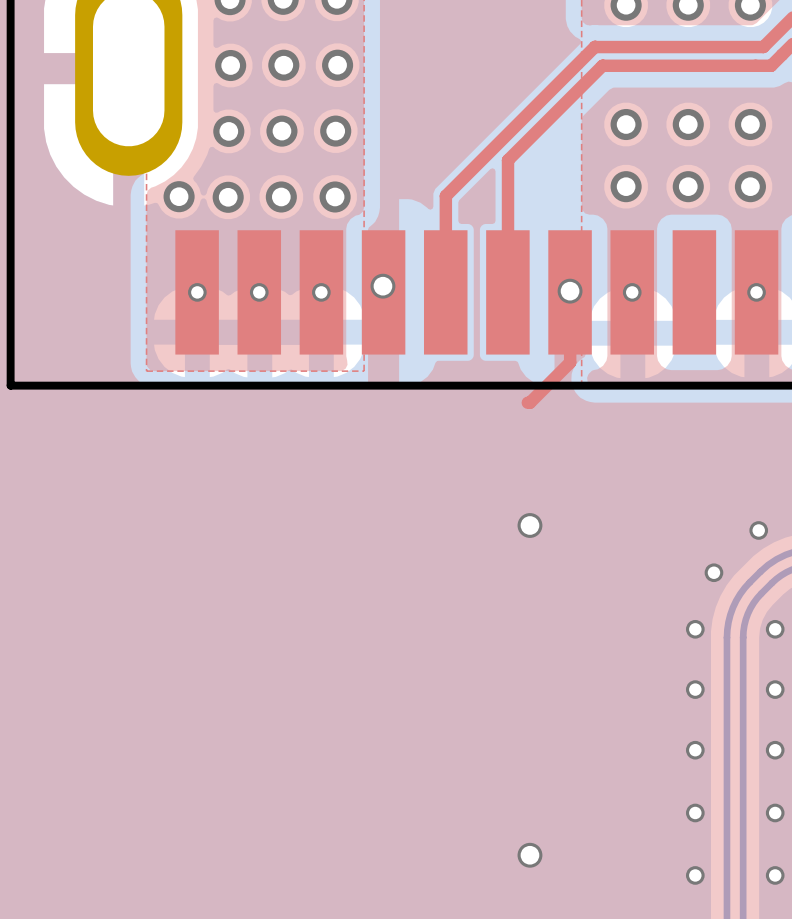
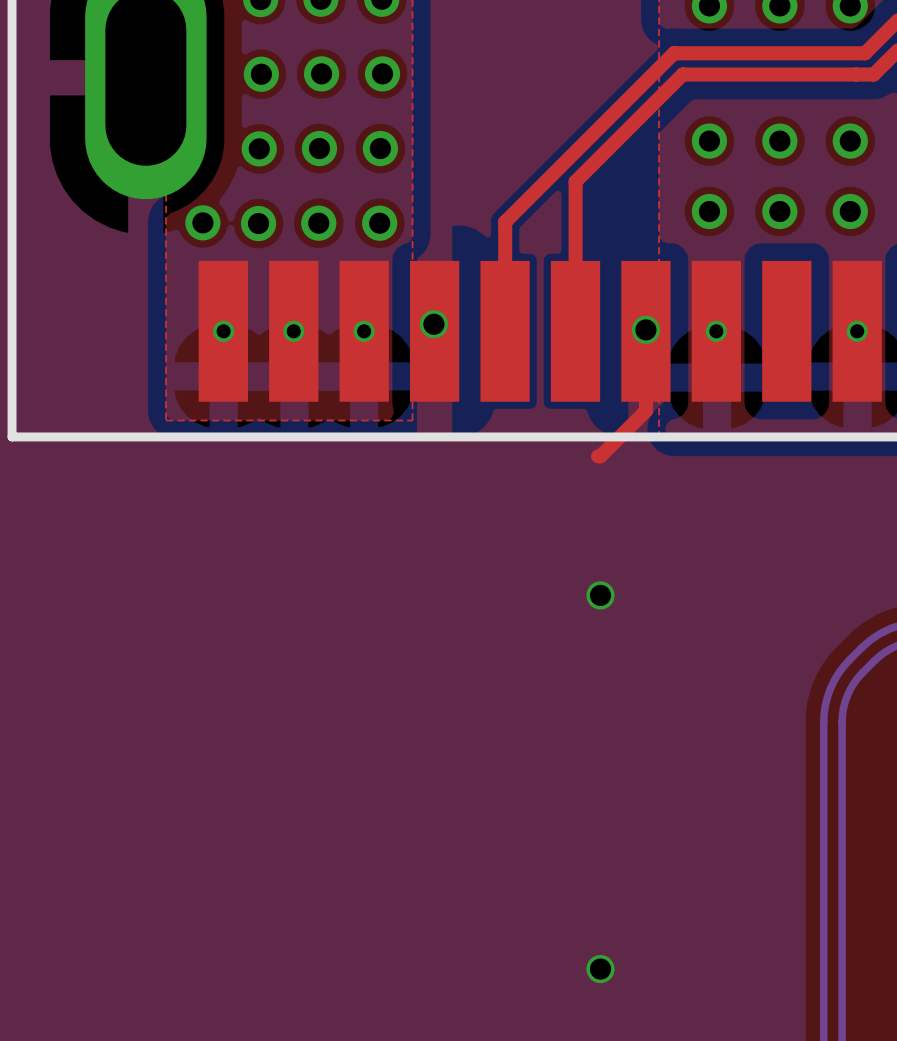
via: (758, 530) -> none
via: (713, 572) -> none
via: (695, 629) -> none
via: (775, 629) -> none
via: (695, 689) -> none
via: (775, 689) -> none
via: (695, 750) -> none
via: (775, 750) -> none
via: (695, 812) -> none
via: (775, 812) -> none
via: (695, 875) -> none
via: (775, 875) -> none

